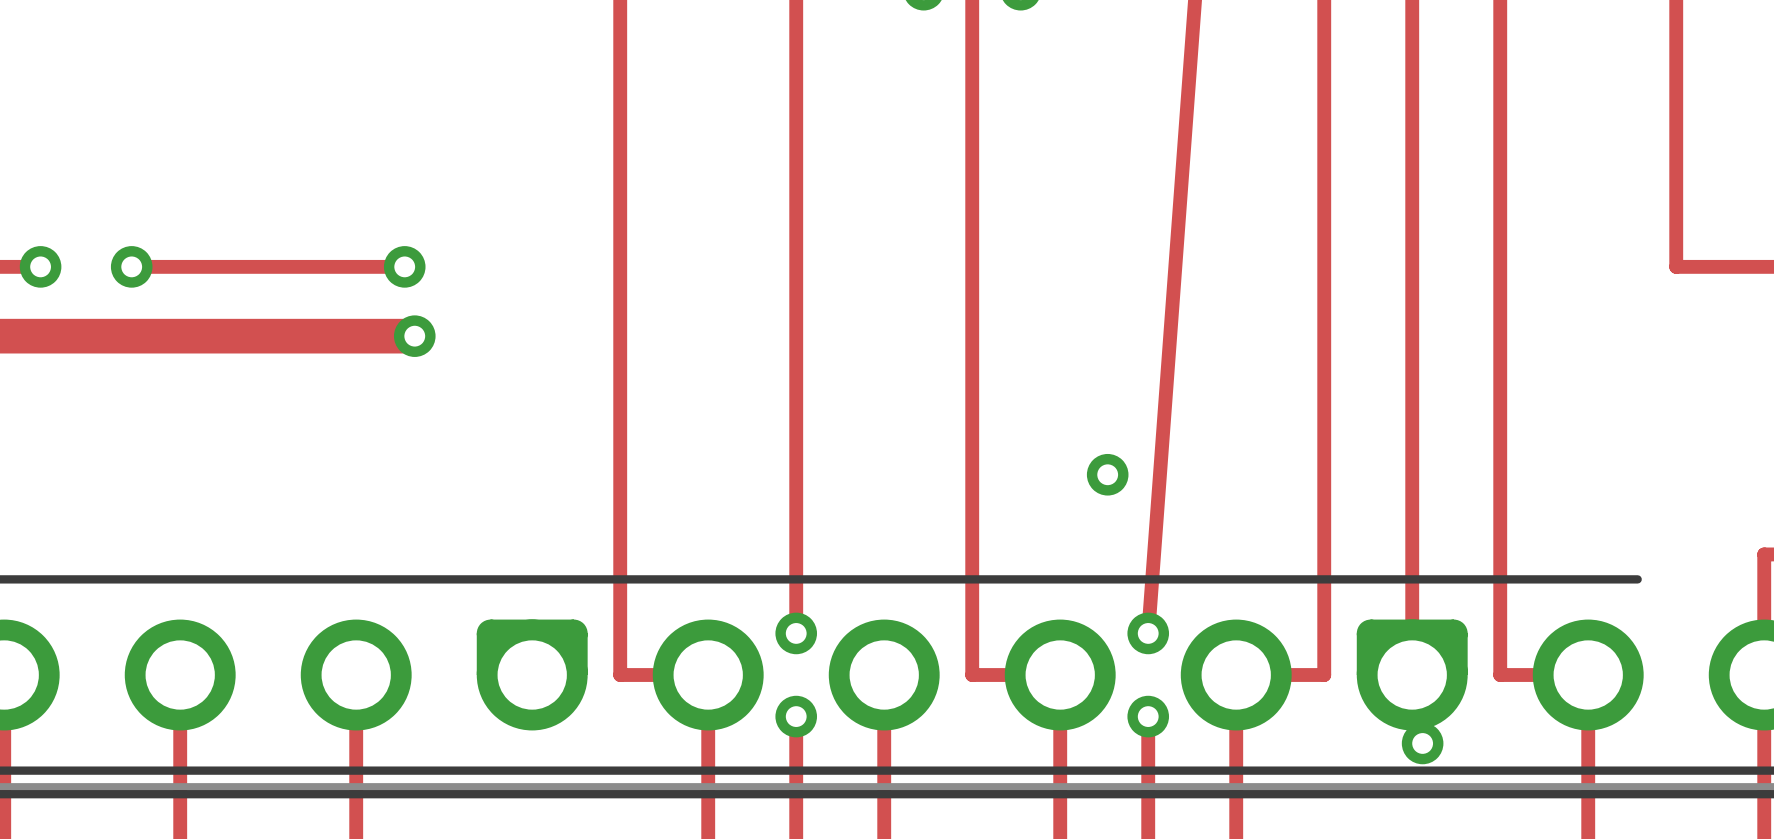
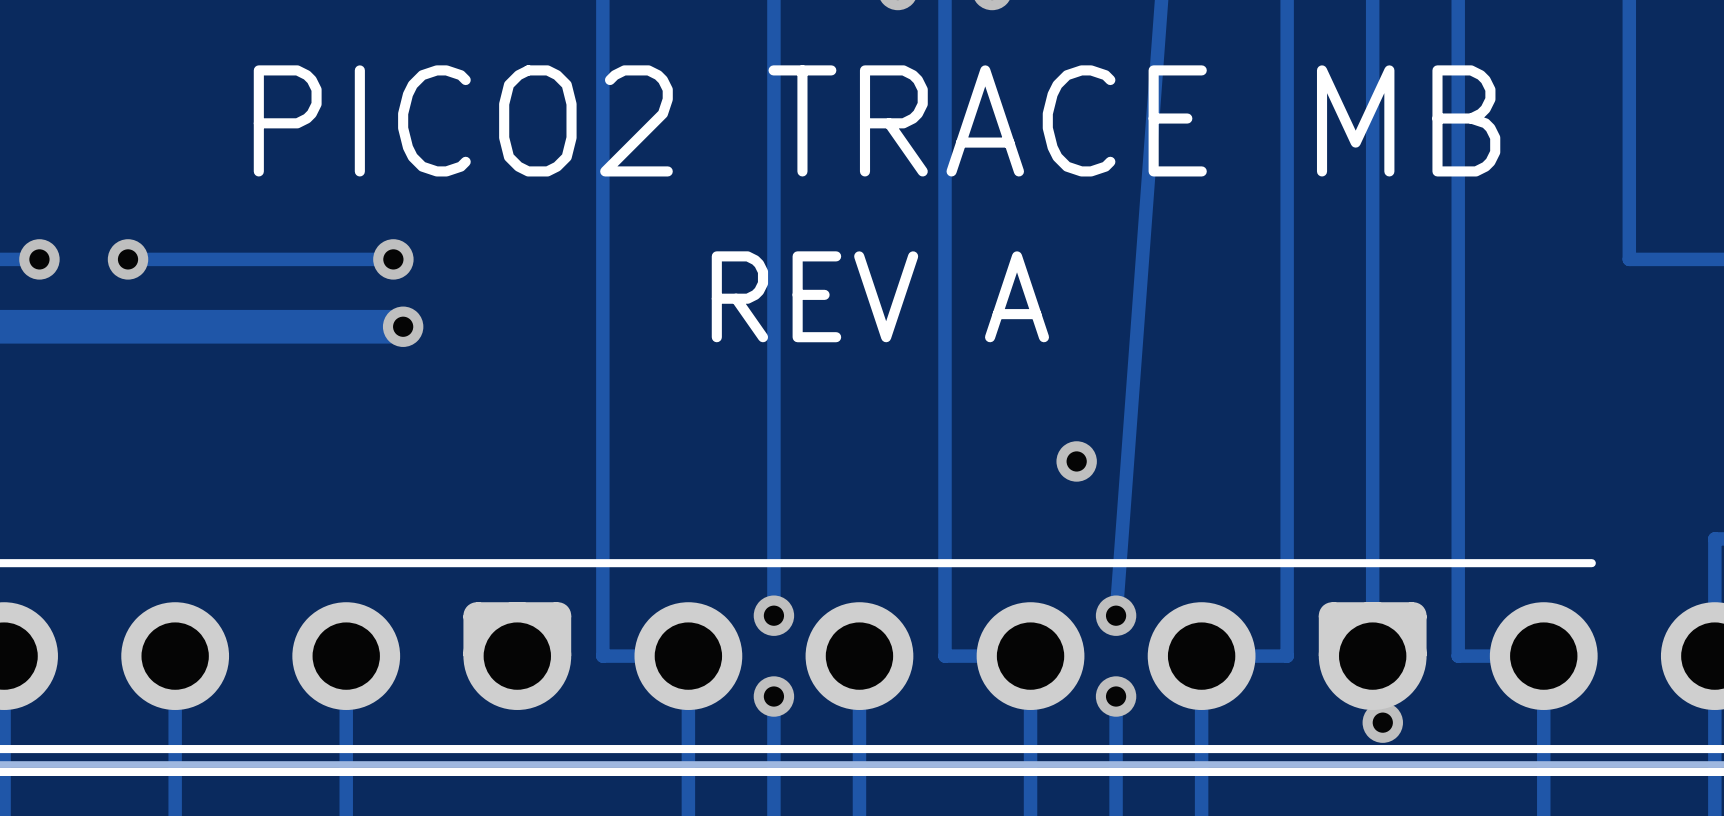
text: none -> PICO2 TRACE MB (877, 120)
text: none -> REV A (880, 296)

